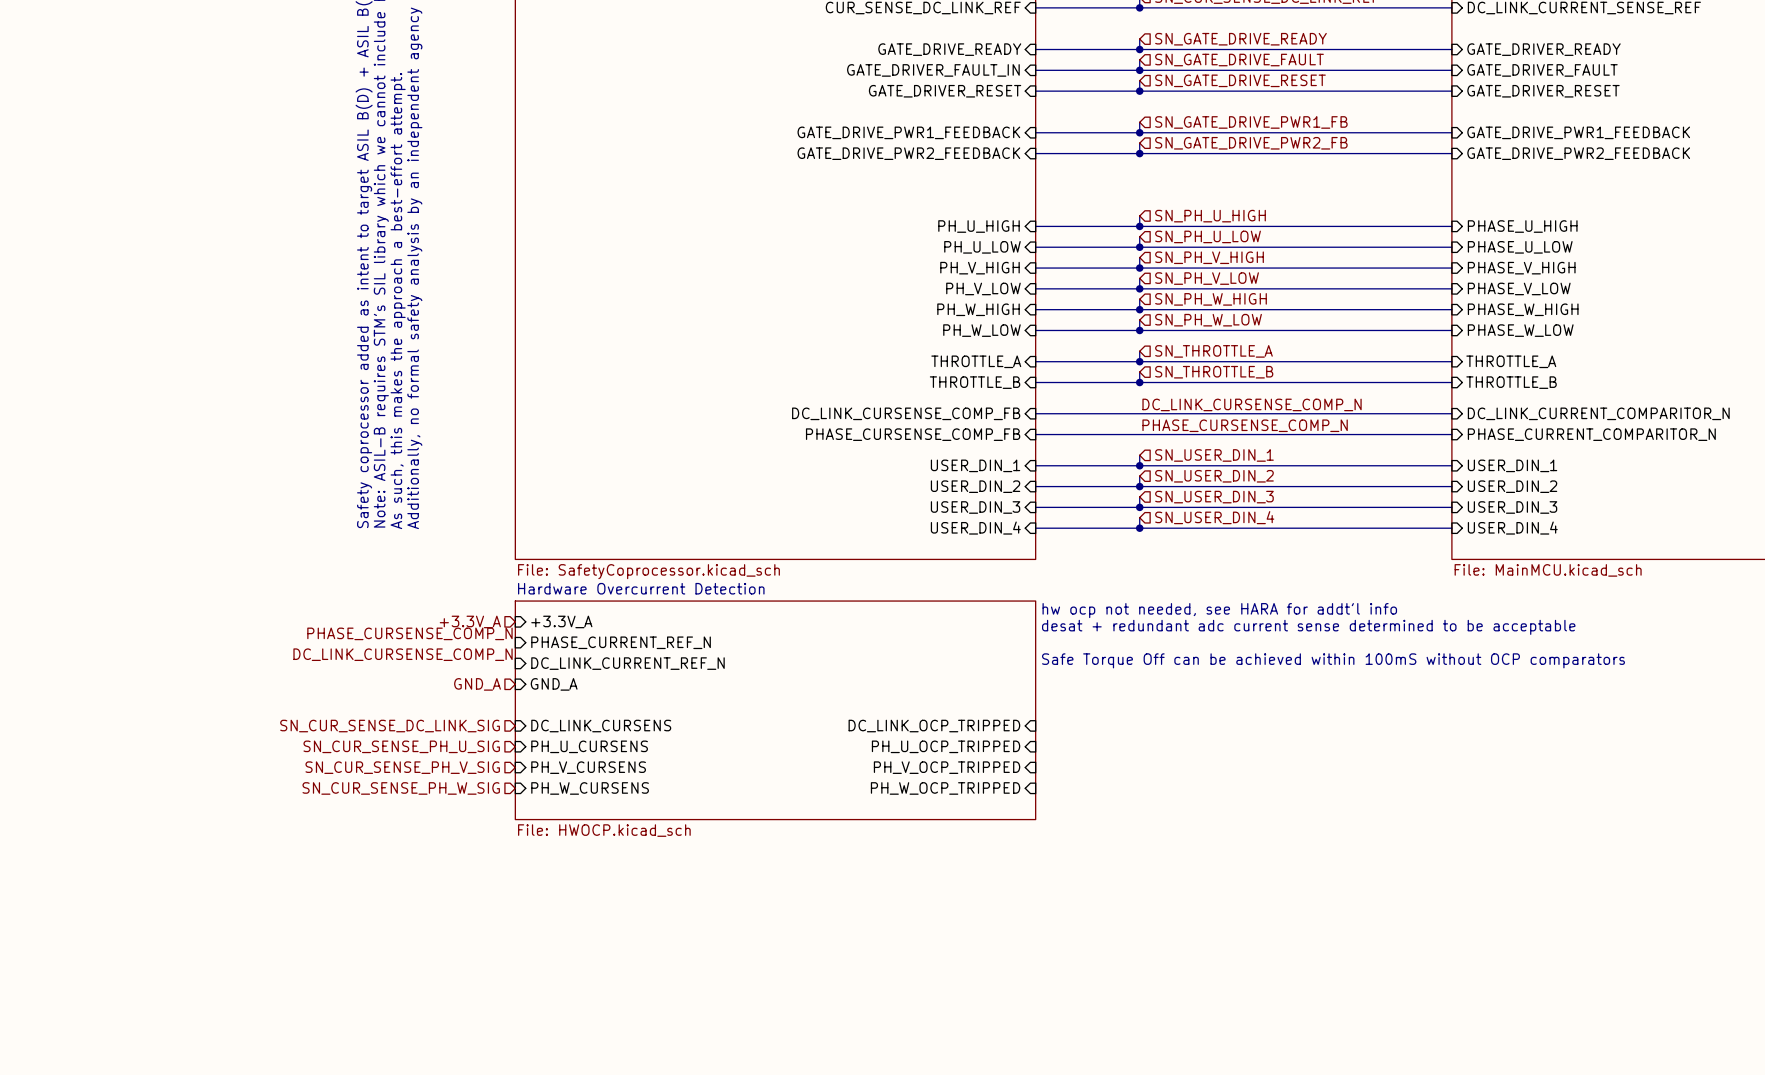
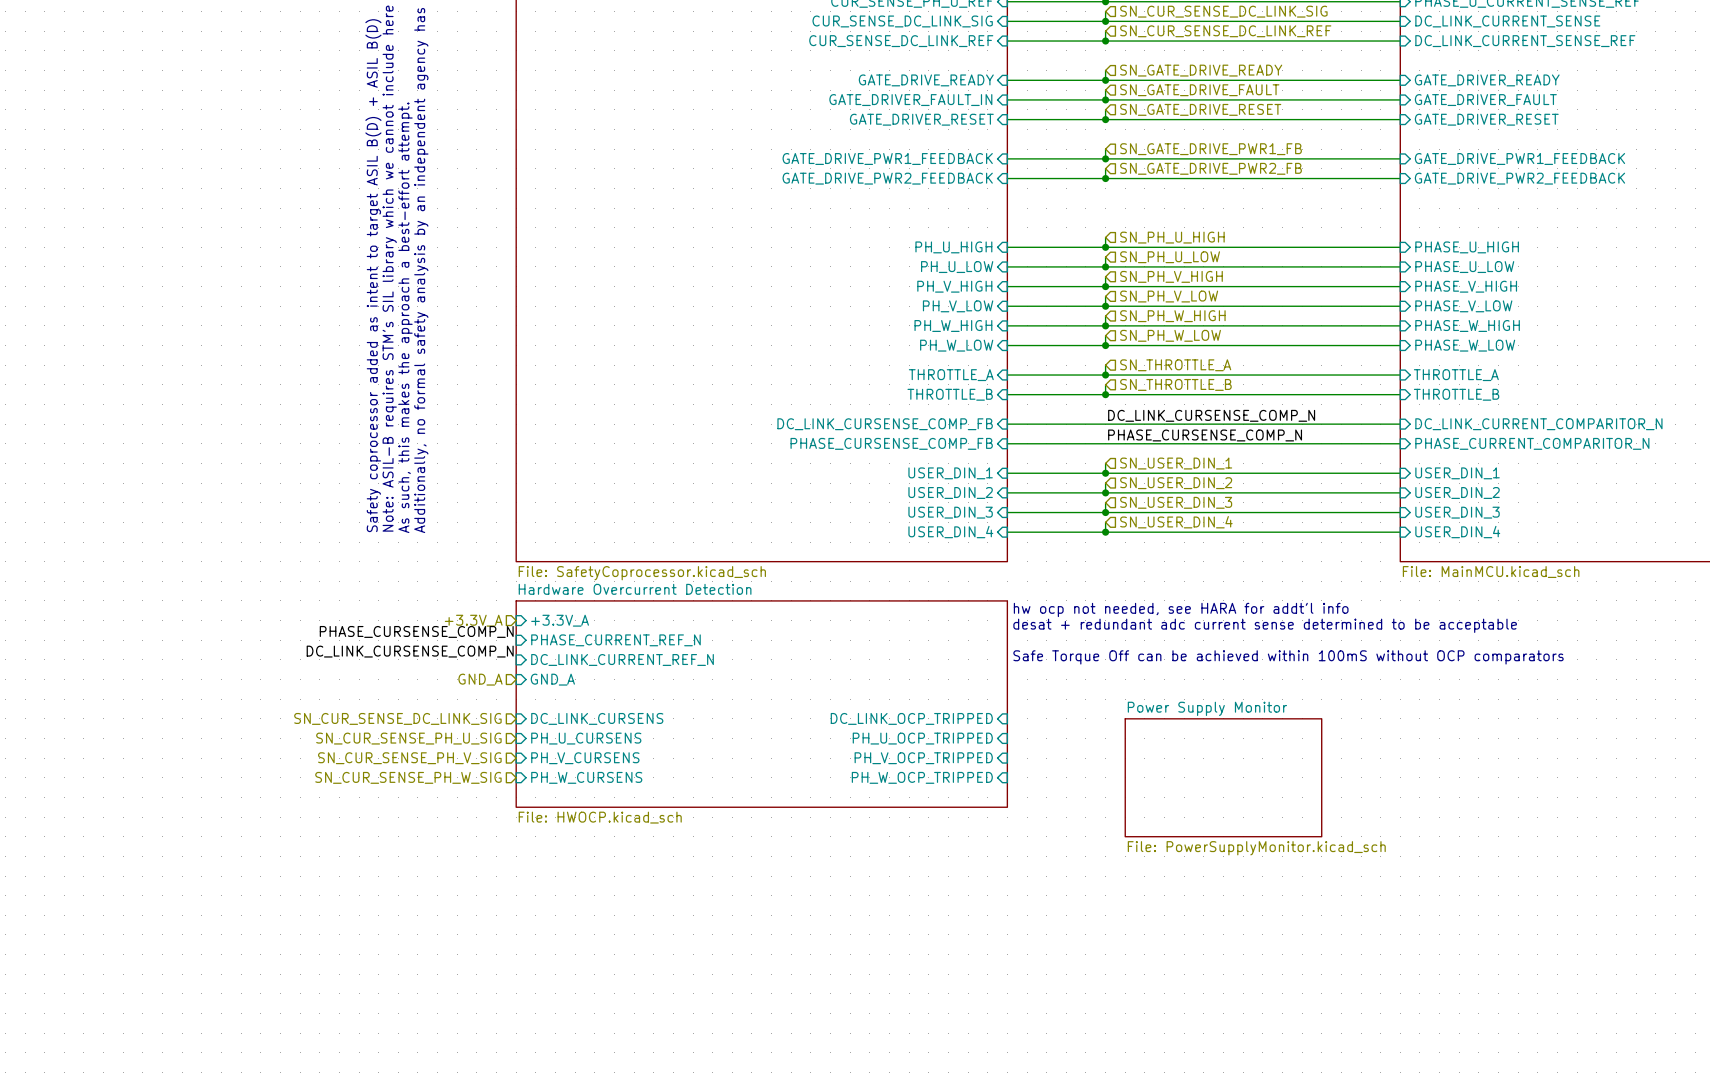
sheet Power Supply Monitor: none -> File: PowerSupplyMonitor.kicad_sch (1223, 777)

